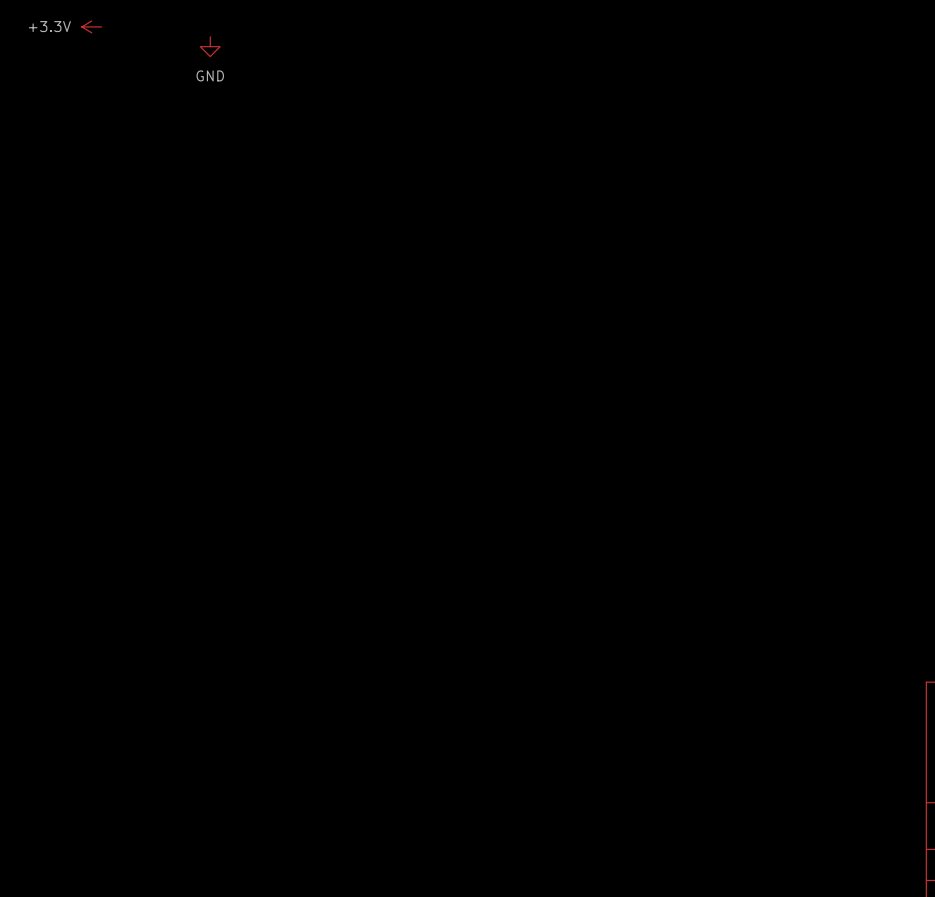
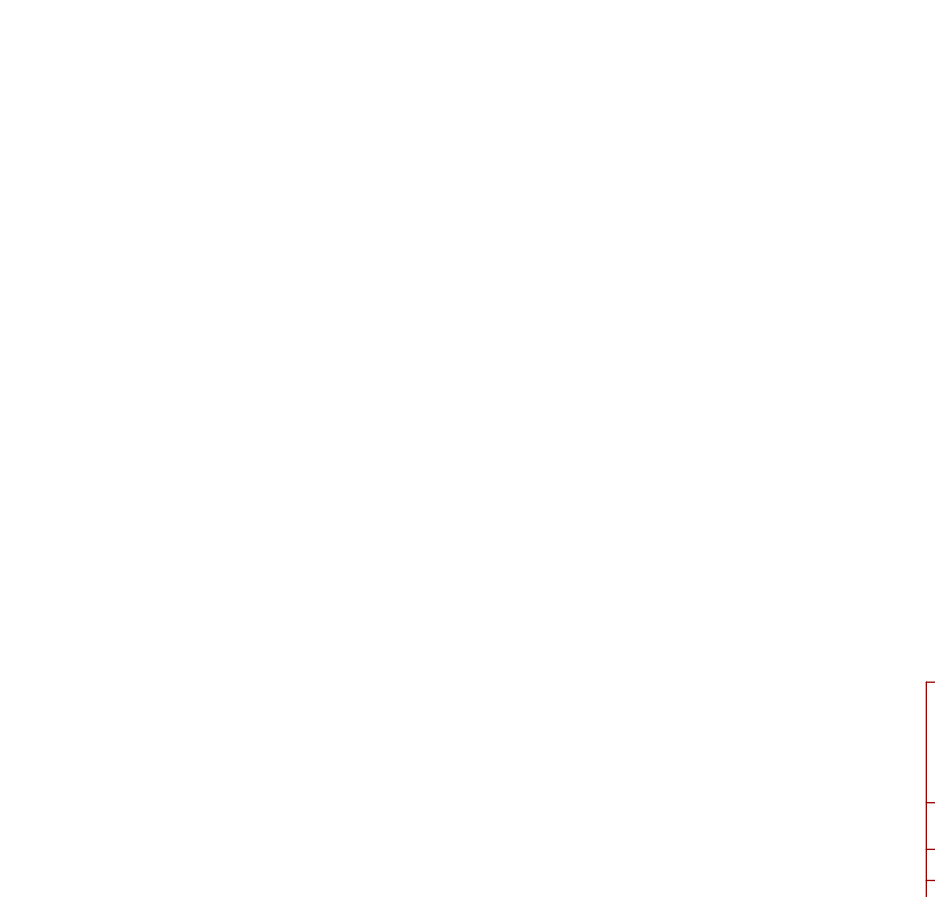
power symbol: +3.3V (91, 26) -> none
power symbol: GND (210, 46) -> none

